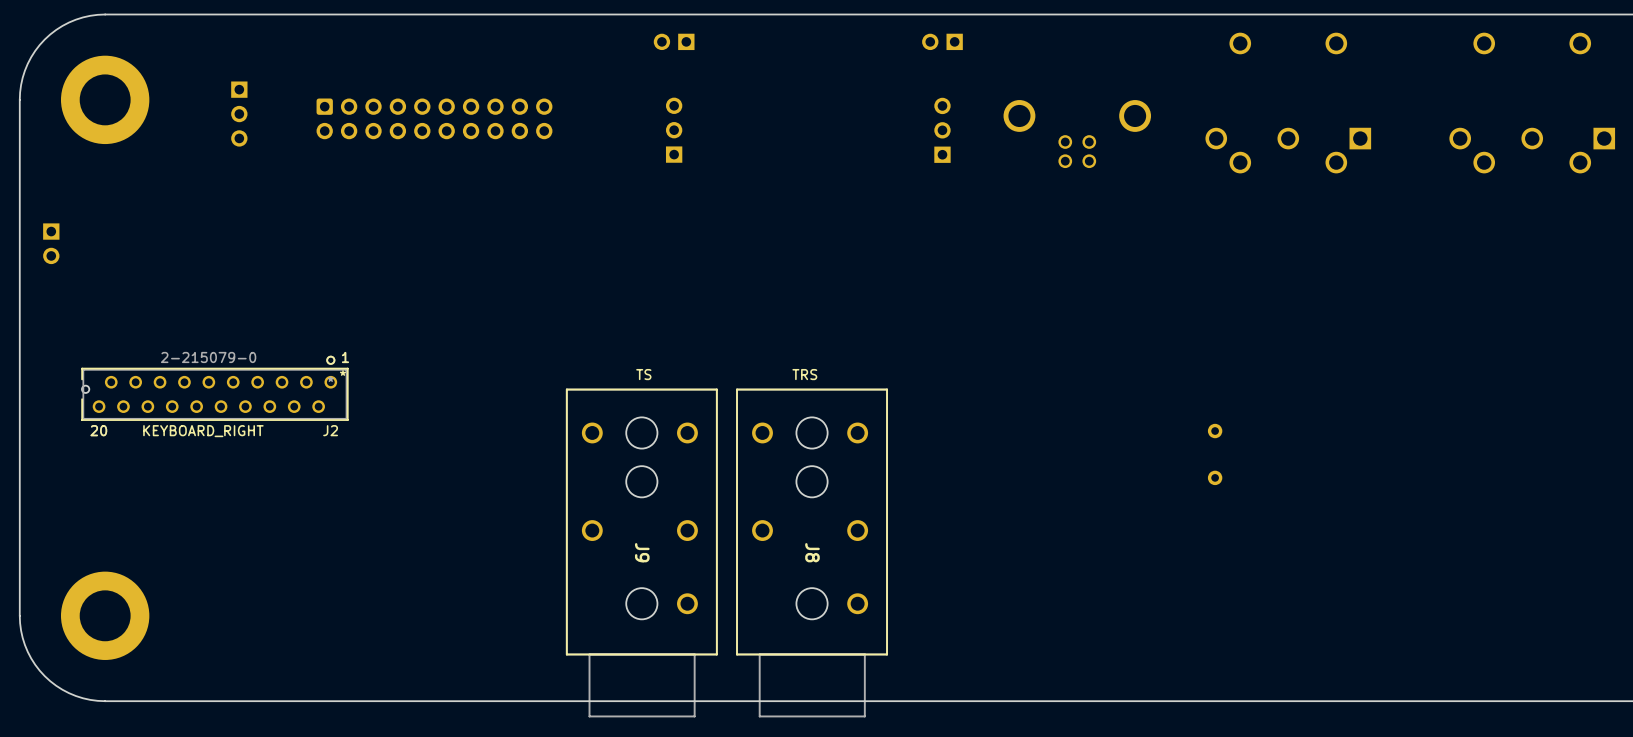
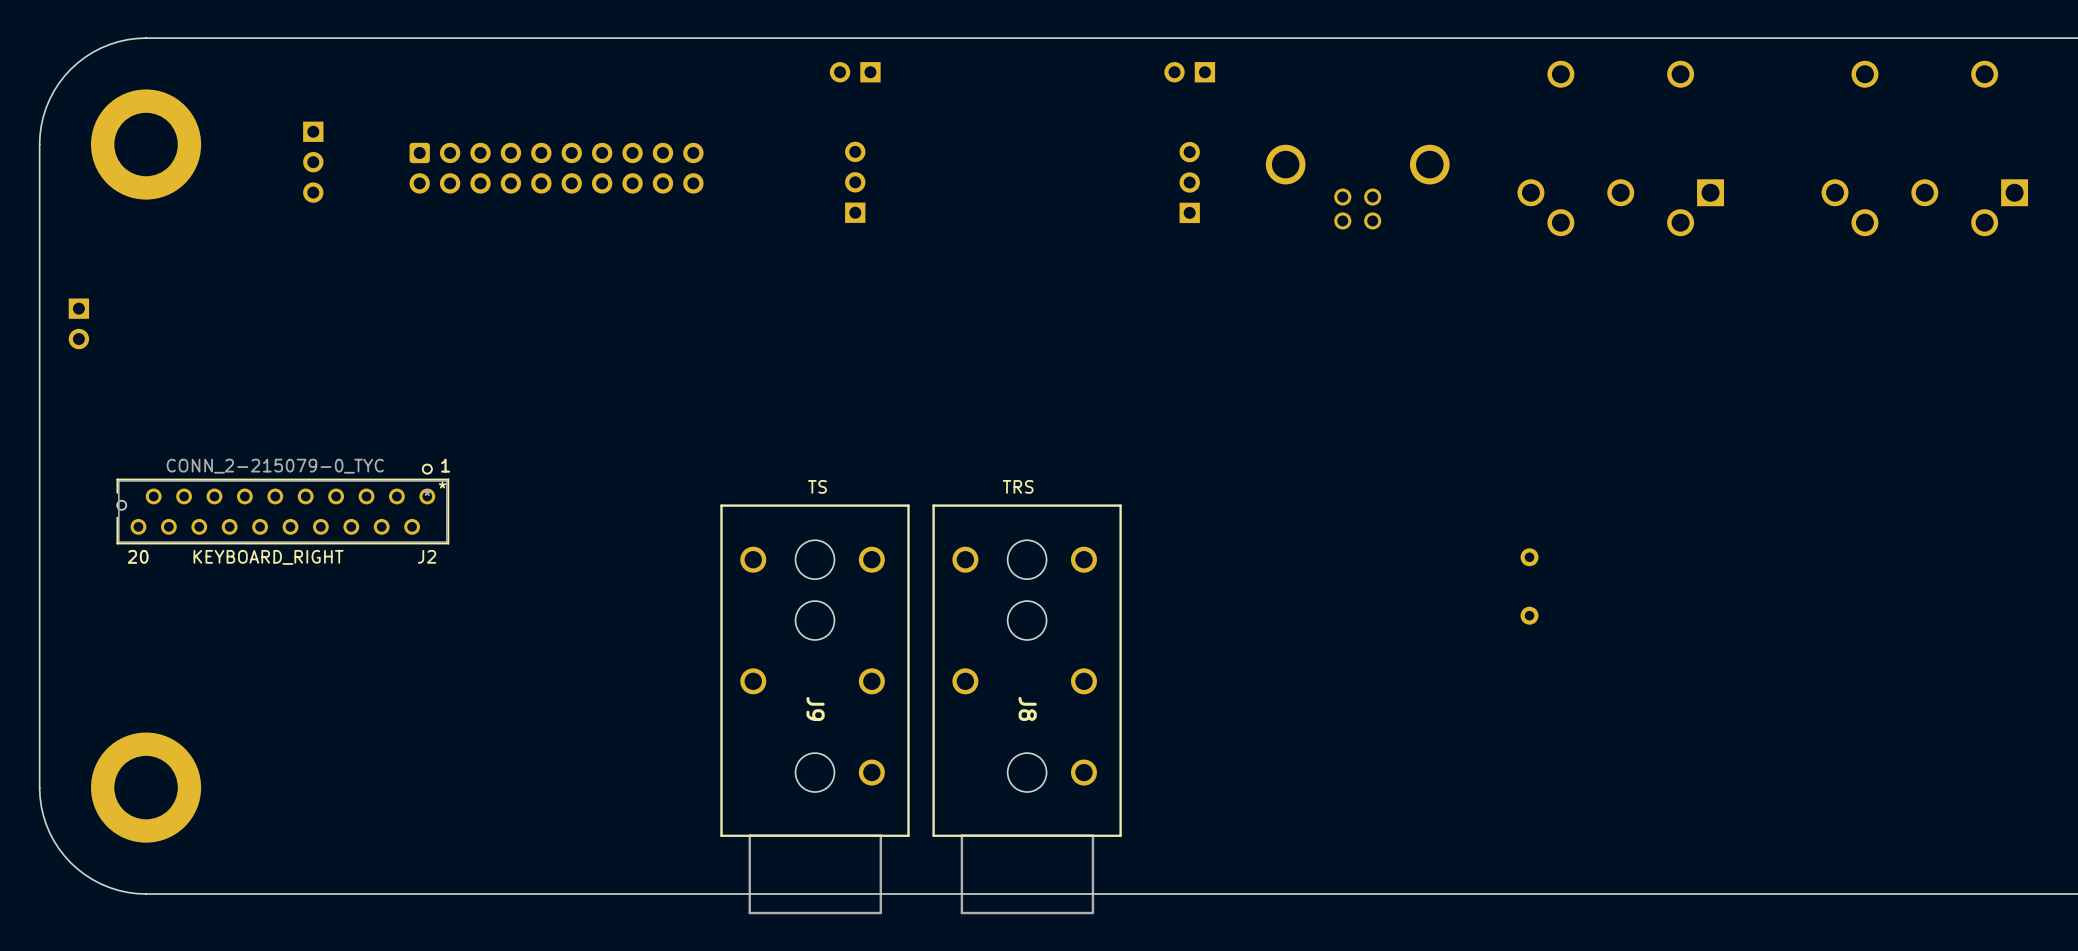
J2 value: 2-215079-0 (208, 357) -> CONN_2-215079-0_TYC (275, 466)

